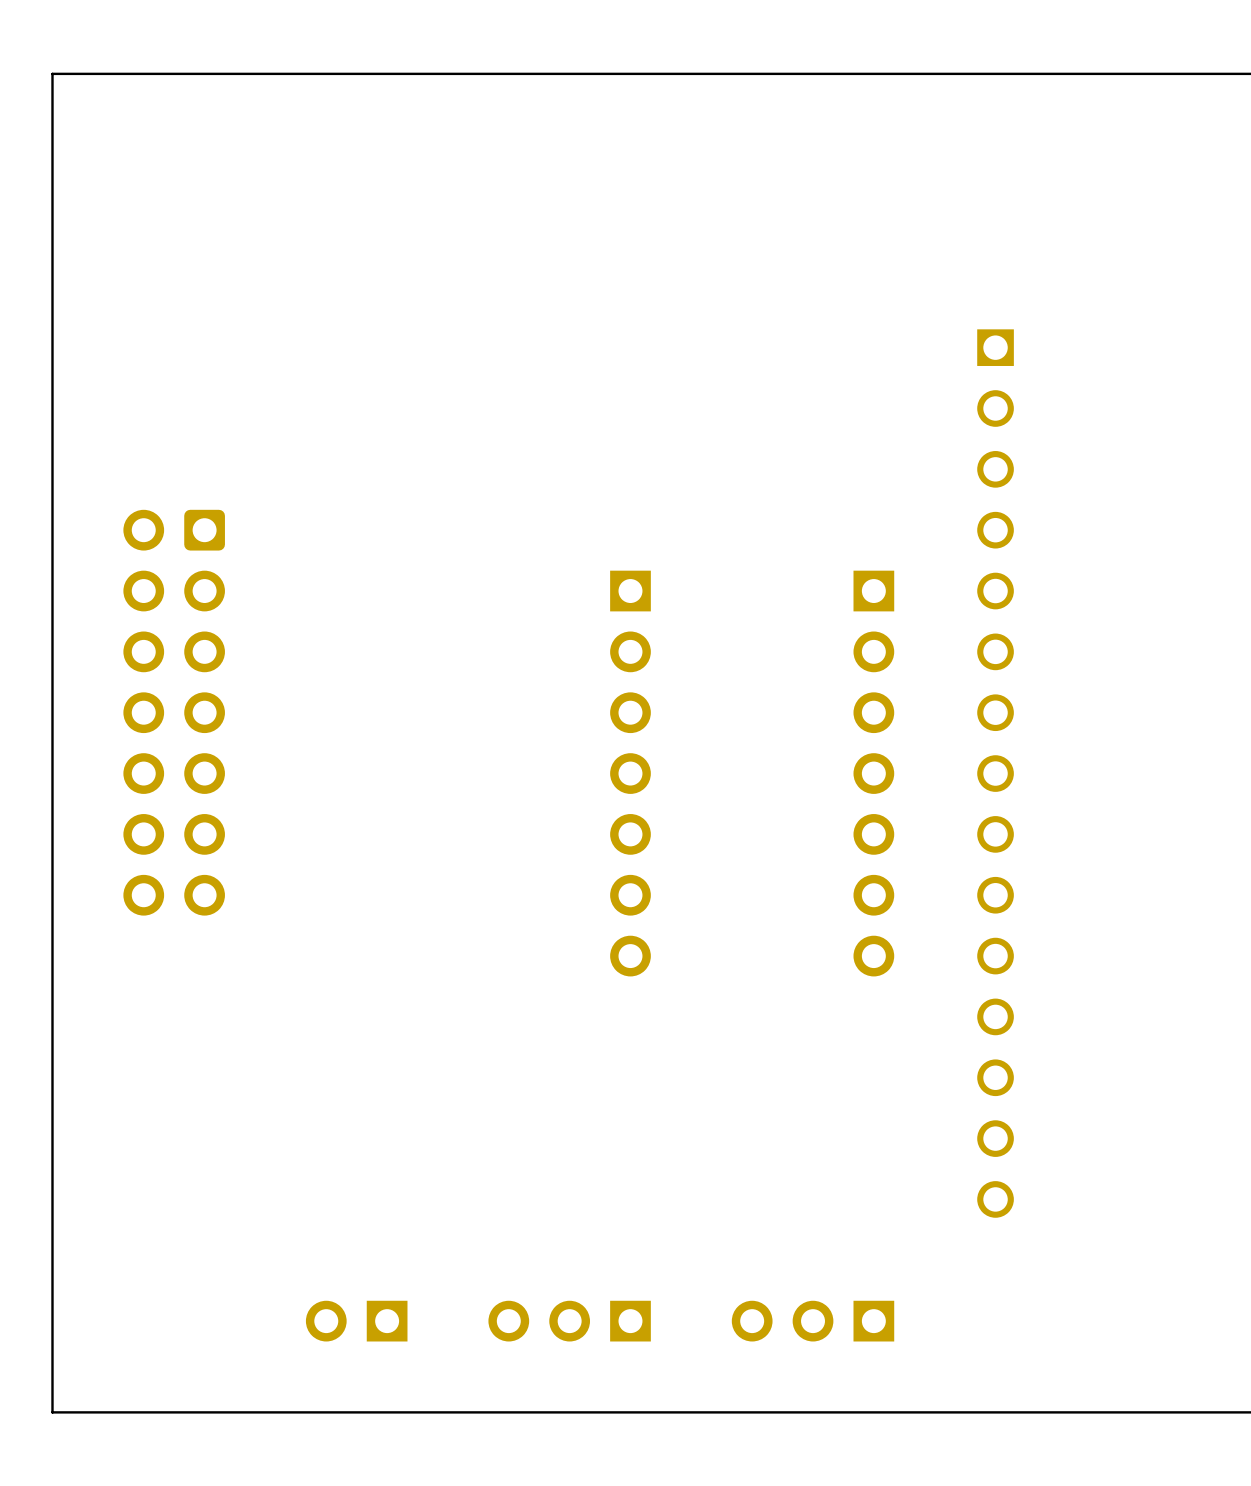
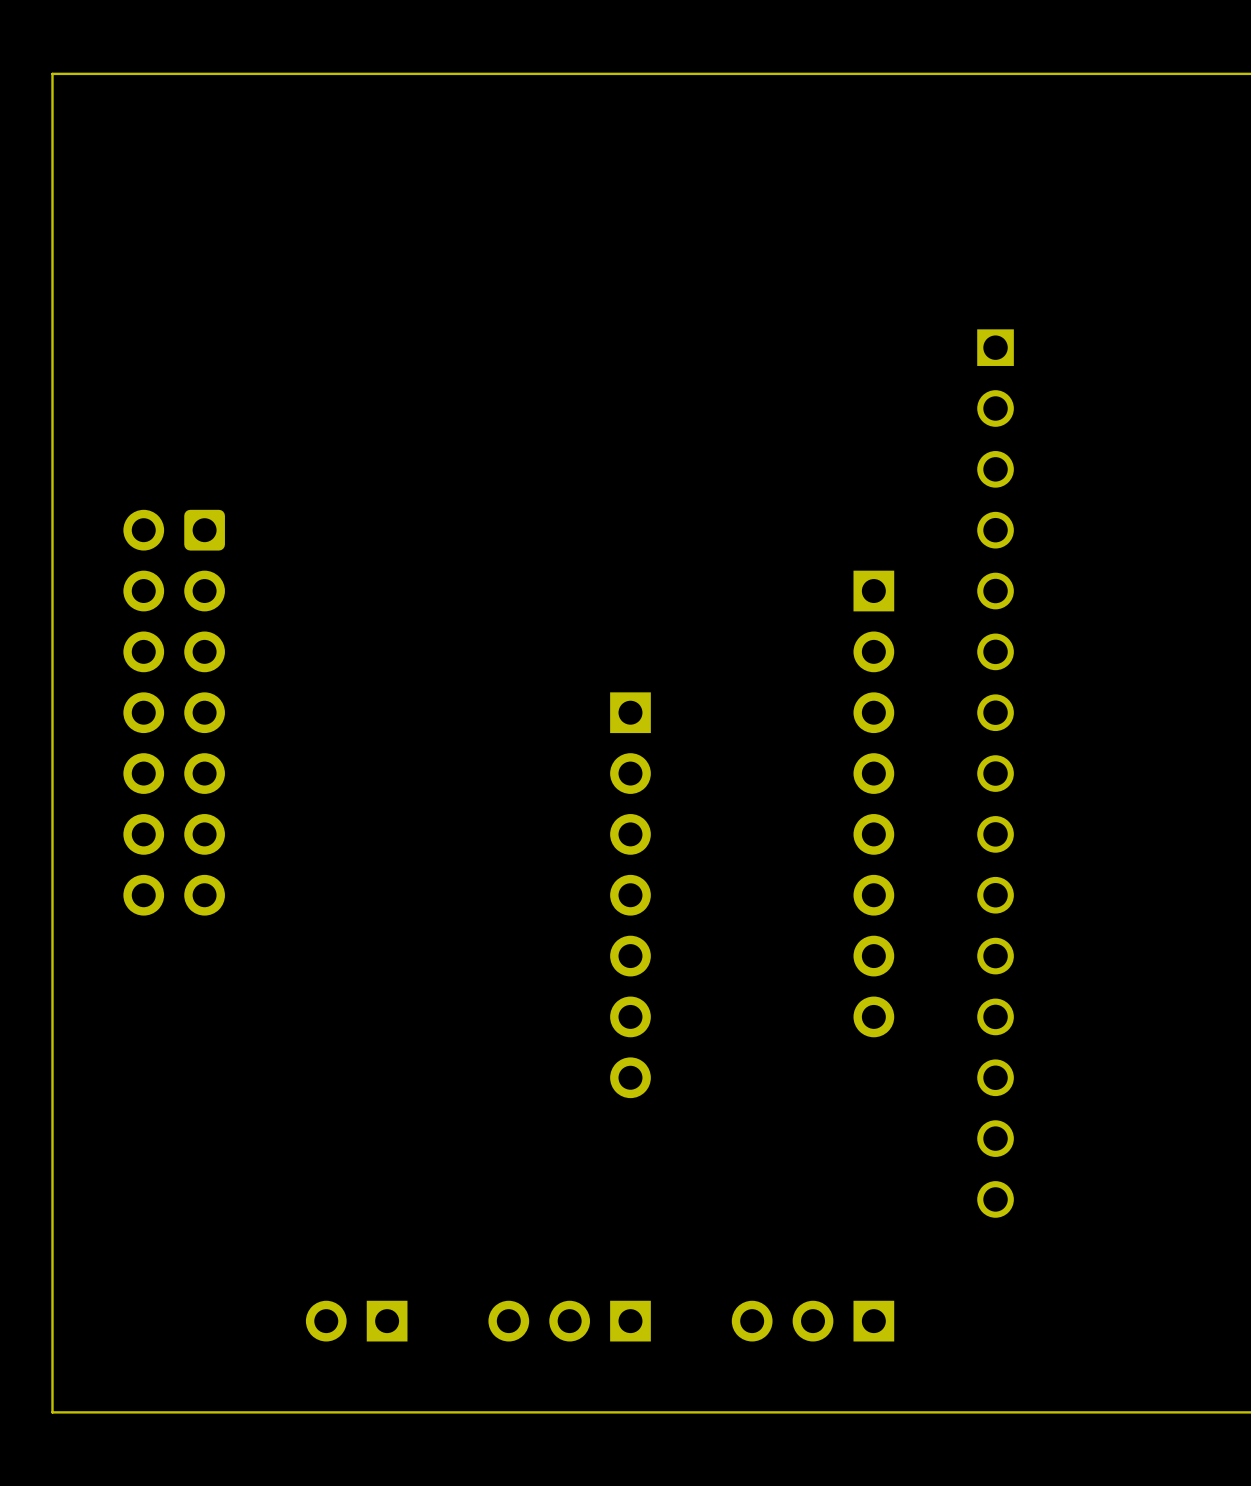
part position: (630, 773) -> (630, 895)
part: none -> (873, 803)

